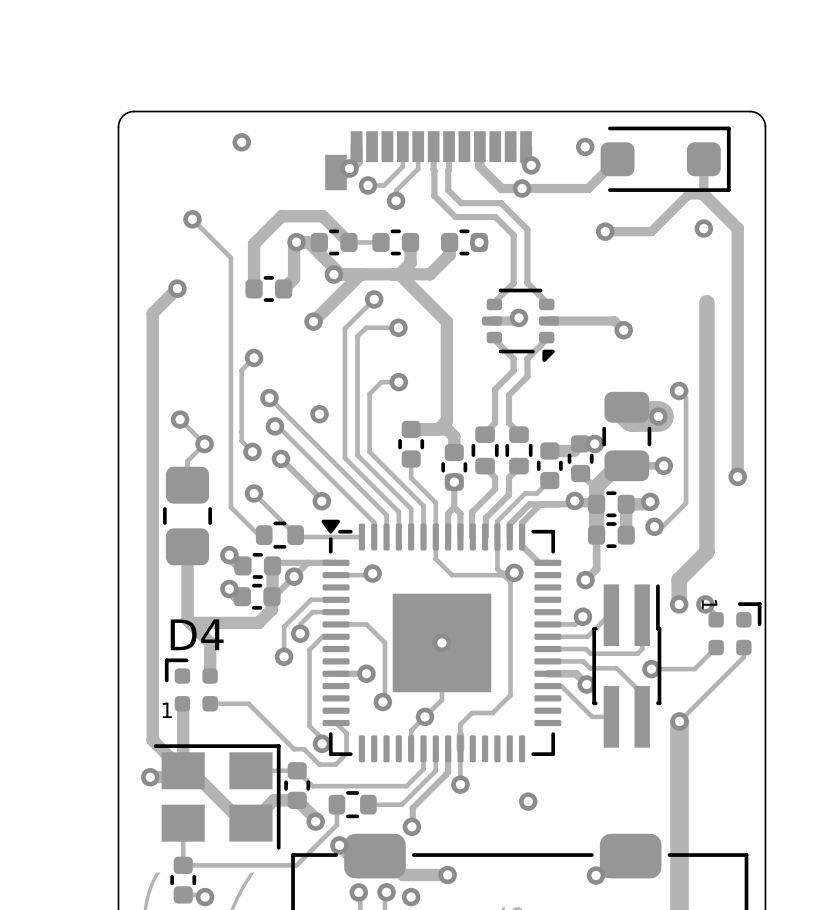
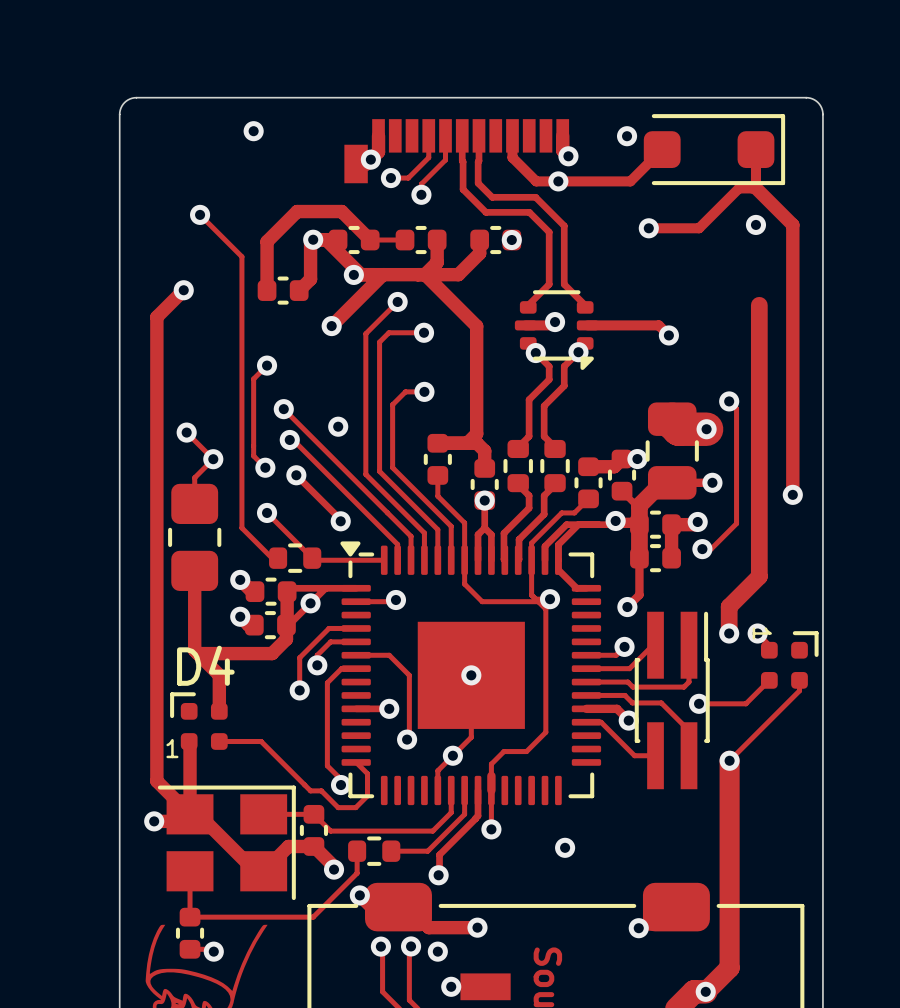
via: none -> (578, 352)
via: none -> (535, 353)

